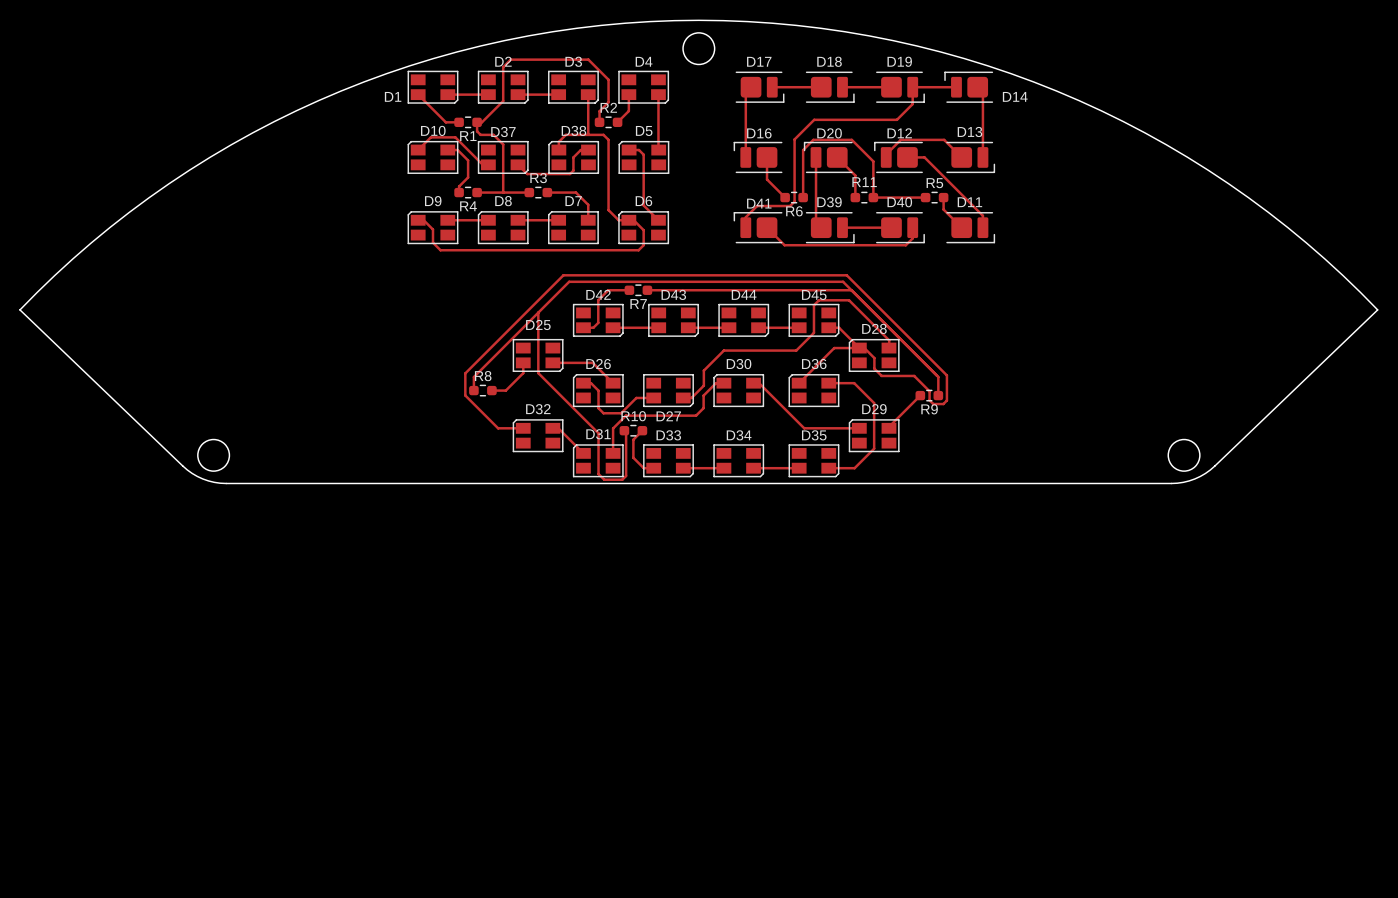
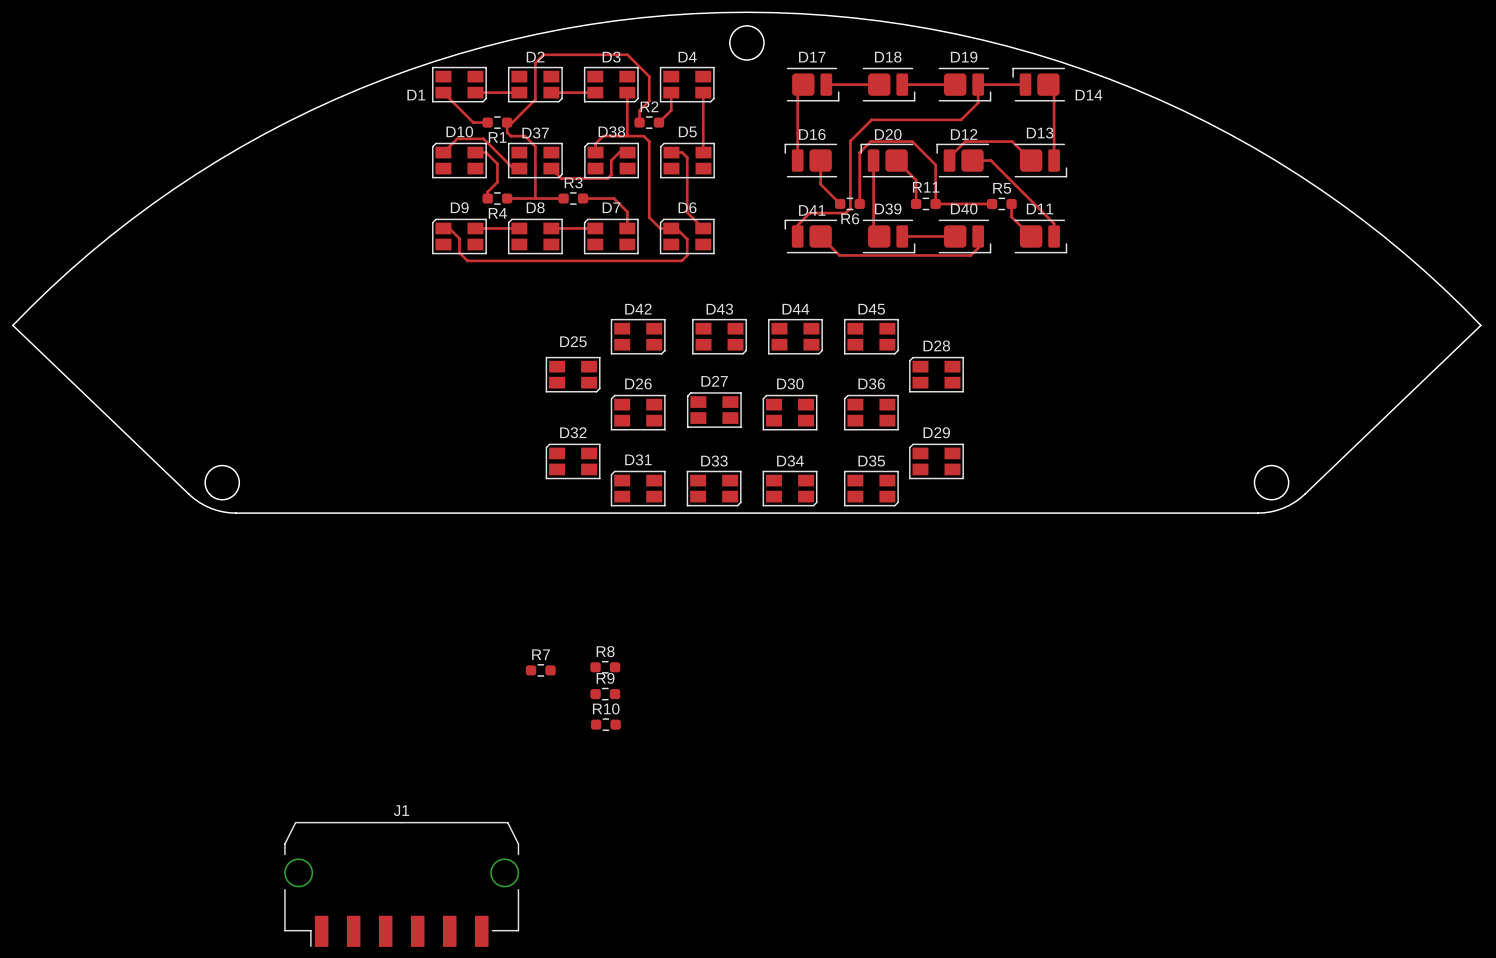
top track: (629, 290) (608, 290) (598, 300) (598, 322) (593, 327) (583, 327) -> none
R7 position: (638, 290) -> (540, 670)
top track: (647, 290) (851, 290) -> none
R7 name position: R7 (638, 304) -> R7 (541, 654)
top track: (538, 312) (538, 373) (598, 433) (598, 473) (604, 479) (622, 479) (626, 475) (626, 432) (624, 430) -> none
top track: (613, 327) (658, 327) -> none
top track: (688, 327) (728, 327) -> none
top track: (758, 327) (799, 327) -> none
top track: (828, 327) (839, 327) (859, 348) -> none
top track: (888, 348) (889, 340) (849, 300) (818, 300) (813, 305) (813, 332) (796, 350) (723, 350) (703, 370) (703, 385) (691, 397) (683, 397) -> none
top track: (523, 362) (523, 373) (505, 390) (491, 390) -> none
top track: (552, 362) (592, 362) (613, 383) -> none
top track: (583, 383) (590, 383) (598, 390) (598, 408) (603, 413) (621, 413) (636, 397) (653, 397) -> none
top track: (723, 383) (716, 383) (703, 395) (703, 408) (696, 415) (625, 415) (613, 428) (613, 453) -> none
top track: (753, 383) (759, 383) (804, 428) (859, 428) -> none
top track: (799, 383) (834, 348) (864, 348) (874, 358) (874, 368) (881, 375) (914, 375) (929, 391) (929, 400) (933, 404) (943, 404) (946, 400) (946, 375) (846, 275) (563, 275) (465, 373) (465, 395) (498, 428) (523, 428) -> none
top track: (828, 383) (854, 383) (874, 403) (874, 448) (854, 468) (828, 468) -> none
top track: (473, 390) (473, 377) (569, 281) (843, 281) (938, 377) (938, 395) -> none
R8 position: (482, 390) -> (605, 667)
D27 rotation: 0° (668, 390) -> 180° (714, 410)
top track: (920, 395) (888, 428) -> none
R9 position: (929, 395) -> (605, 694)
R9 name position: R9 (929, 409) -> R9 (605, 678)
top track: (552, 428) (558, 428) (583, 453) -> none
R10 position: (633, 430) -> (605, 724)
top track: (642, 430) (633, 439) (633, 457) (643, 468) (653, 468) -> none
top track: (683, 468) (723, 468) -> none
top track: (753, 468) (799, 468) -> none
J1: none -> (401, 884)

